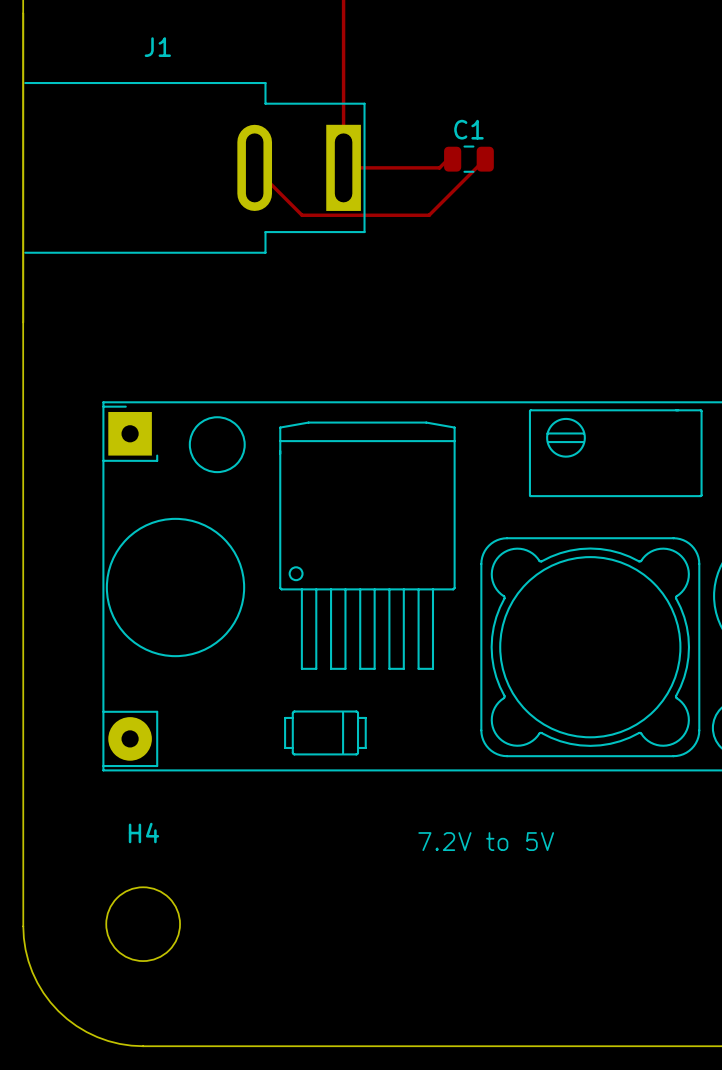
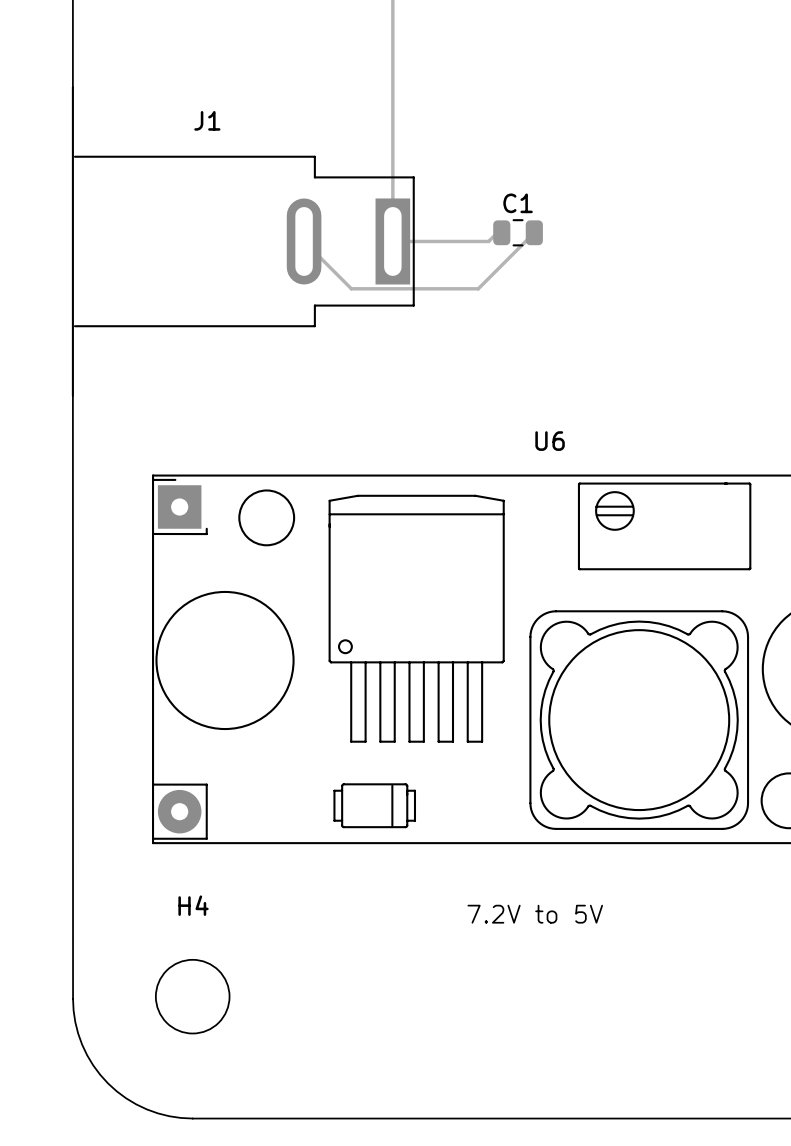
U6 name: none -> U6 (550, 441)

